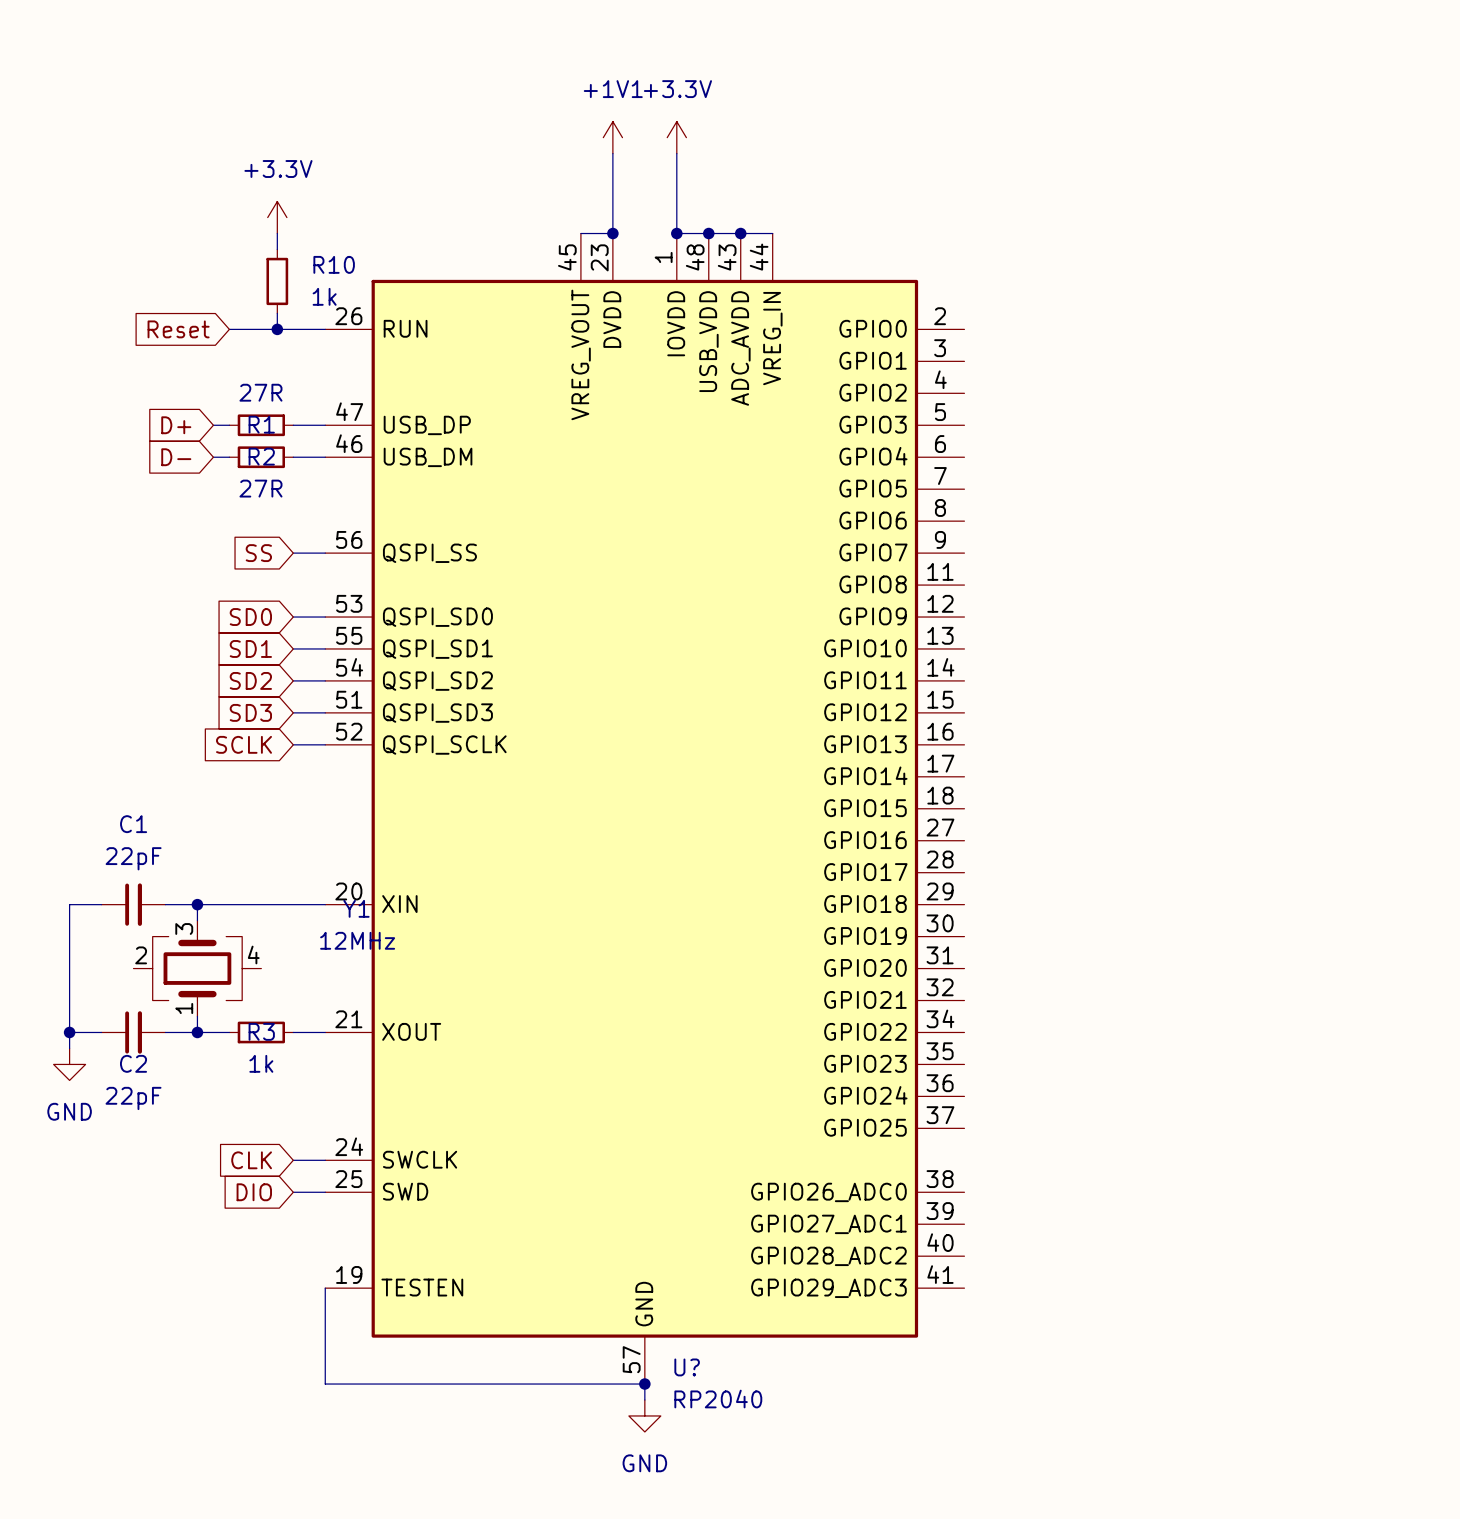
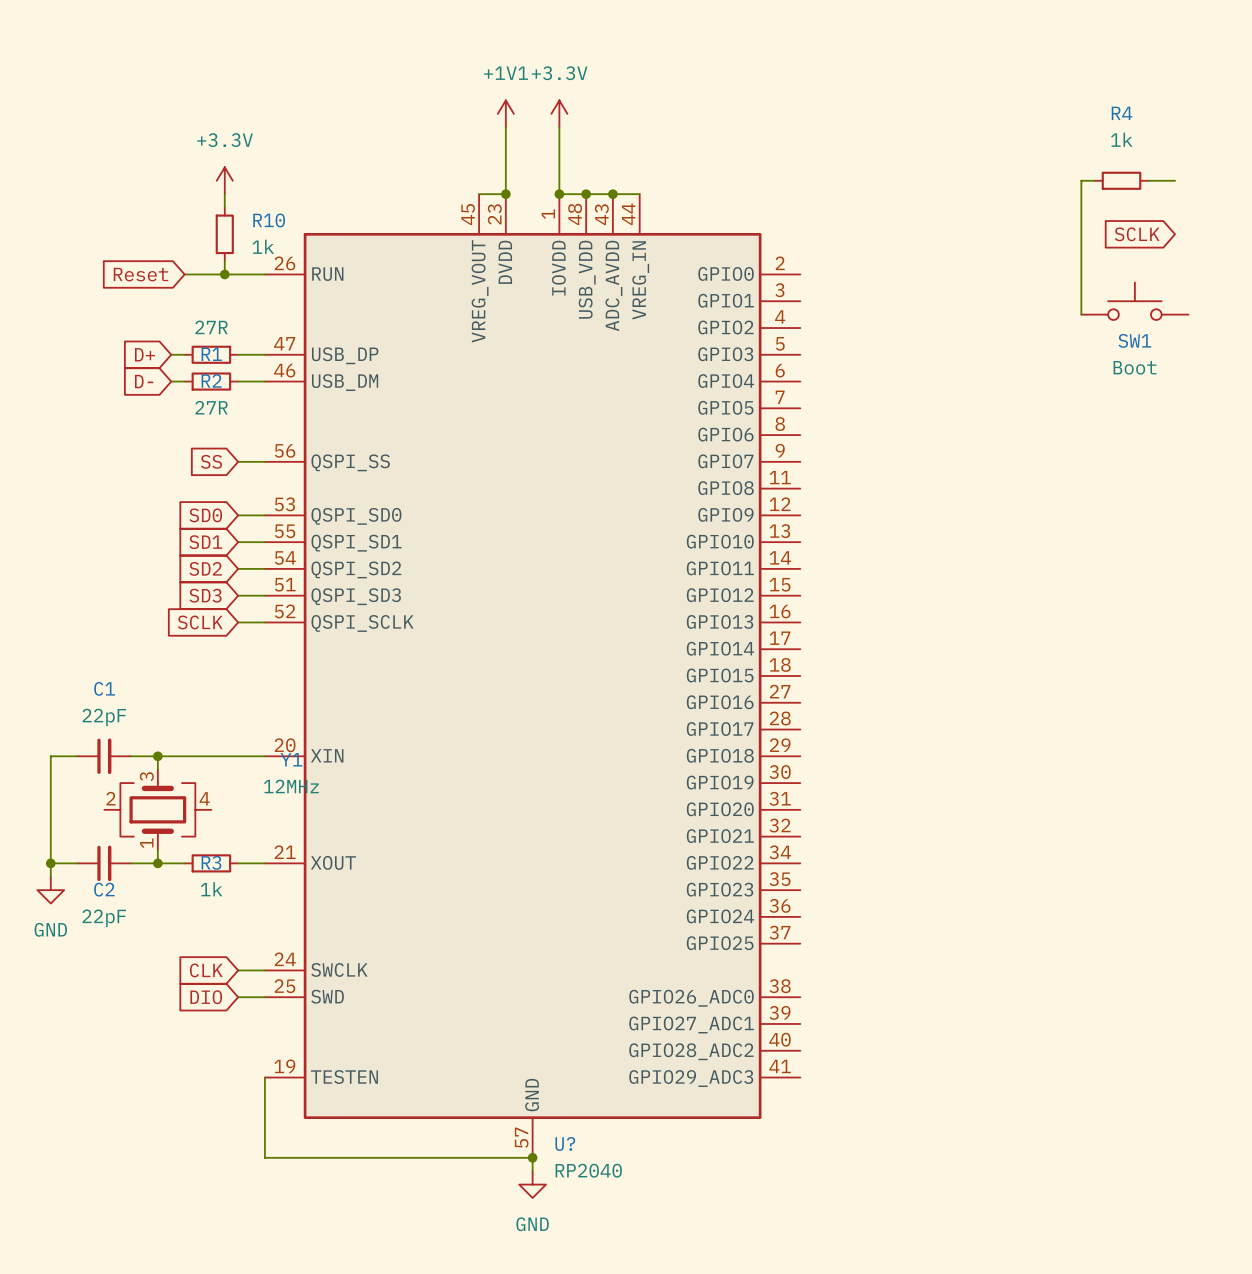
wire: none -> (1094, 180) (1081, 180) (1081, 314)
R4: none -> 1k (1121, 180)
wire: none -> (1148, 180) (1175, 180)
global label: none -> SCLK (1137, 234)
SW1: none -> Boot (1134, 301)

